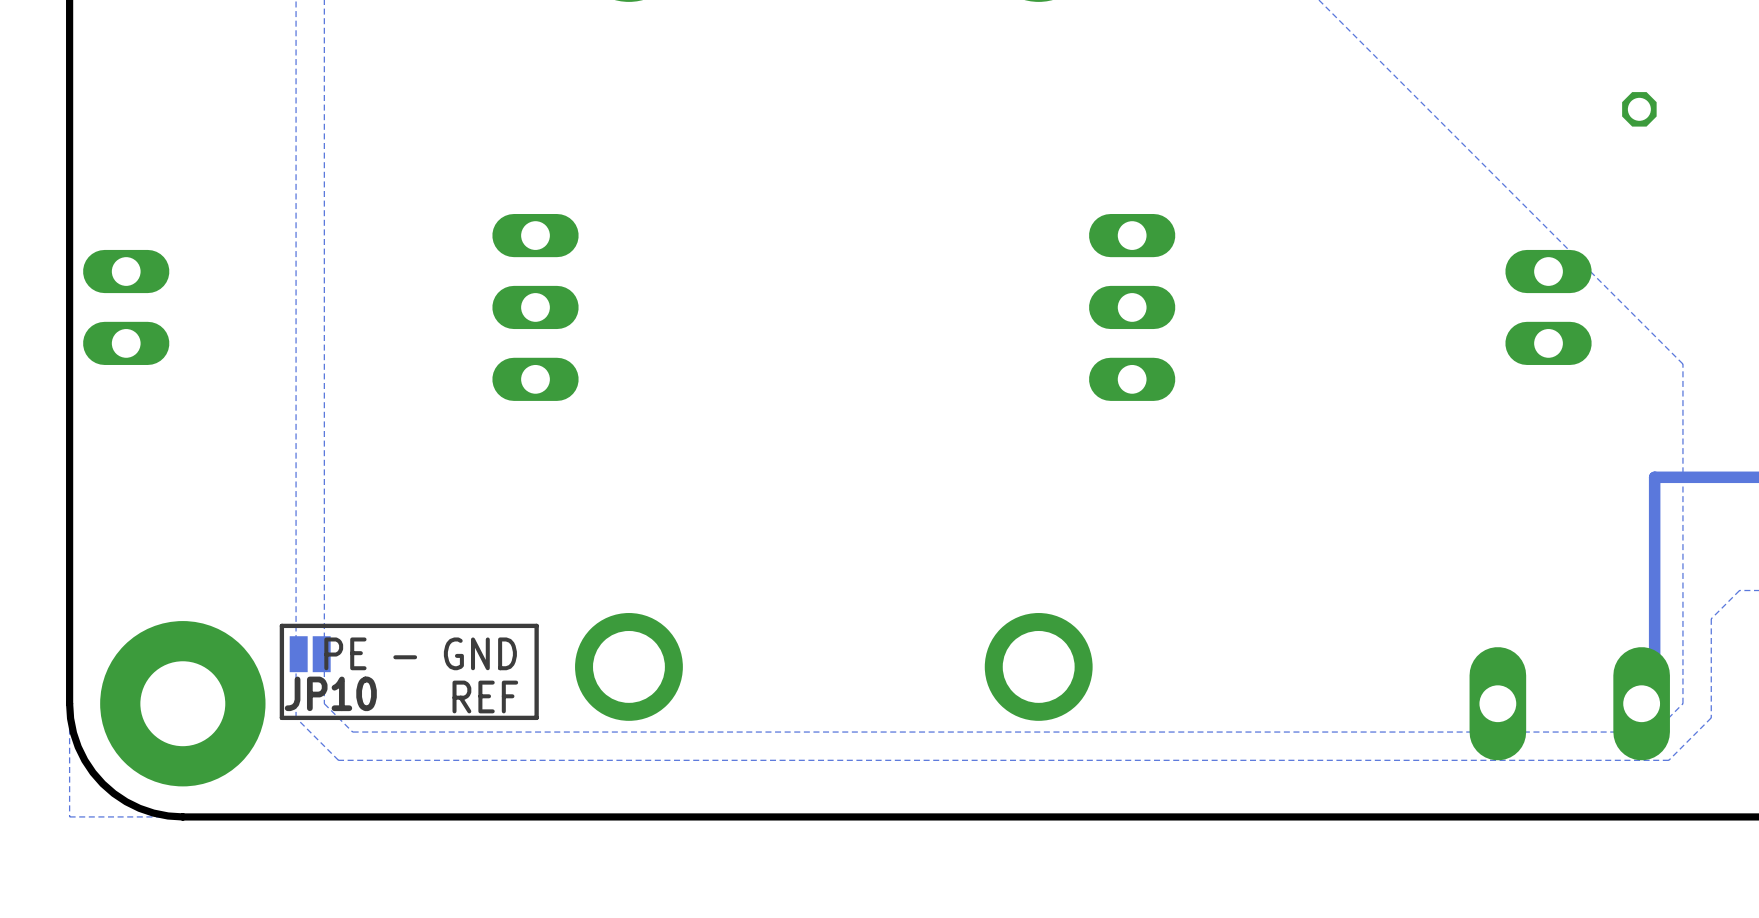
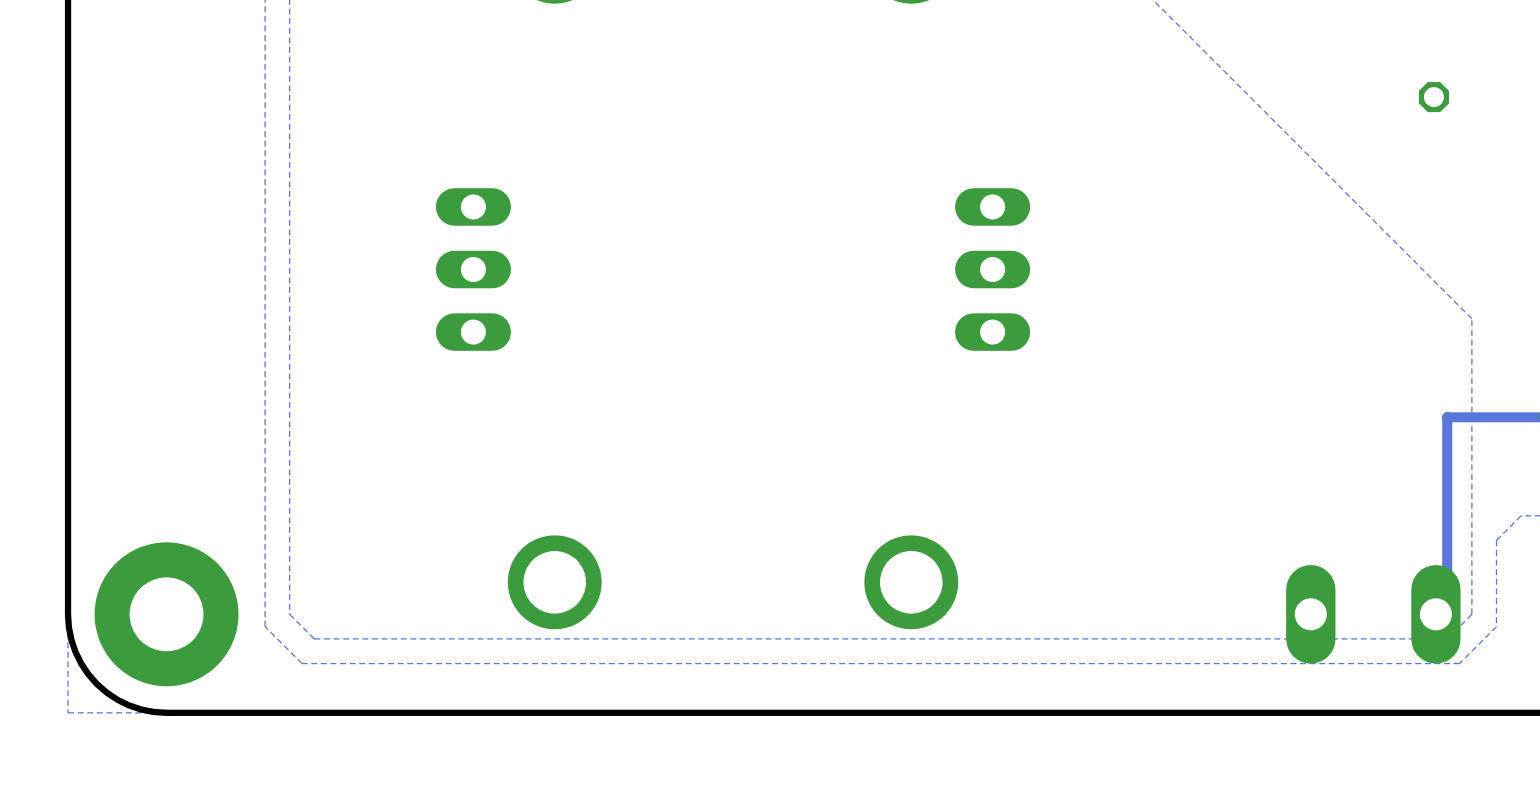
part: (126, 307) -> none
part: (1548, 307) -> none
line: (536, 625) (536, 717) (281, 717) (281, 625) (536, 625) -> none
text: PE - GND (420, 653) -> none
JP10: (310, 654) -> none
text: REF (485, 696) -> none

